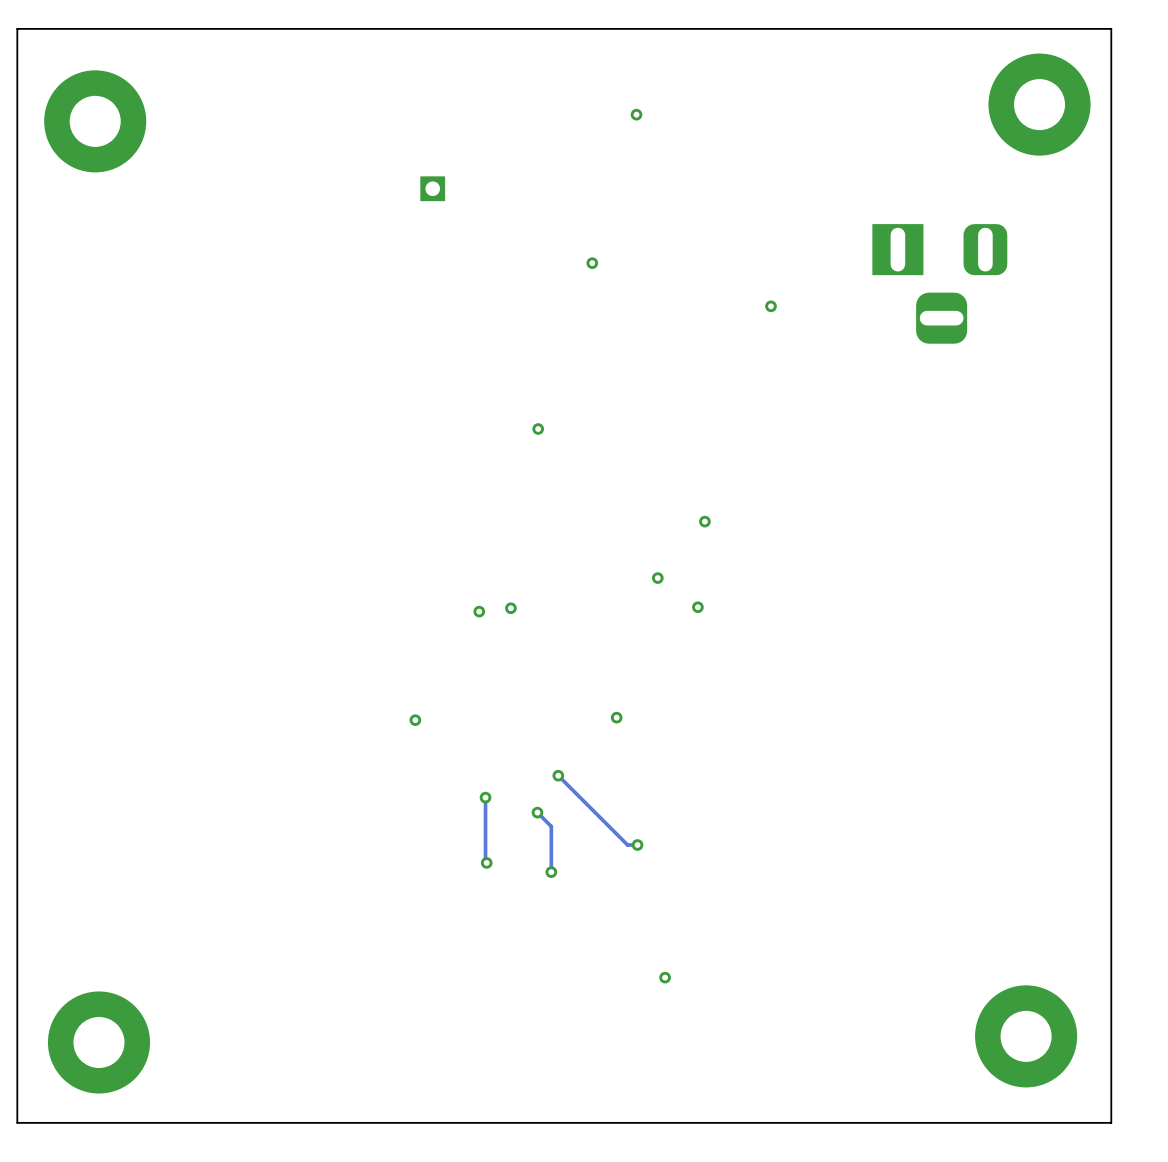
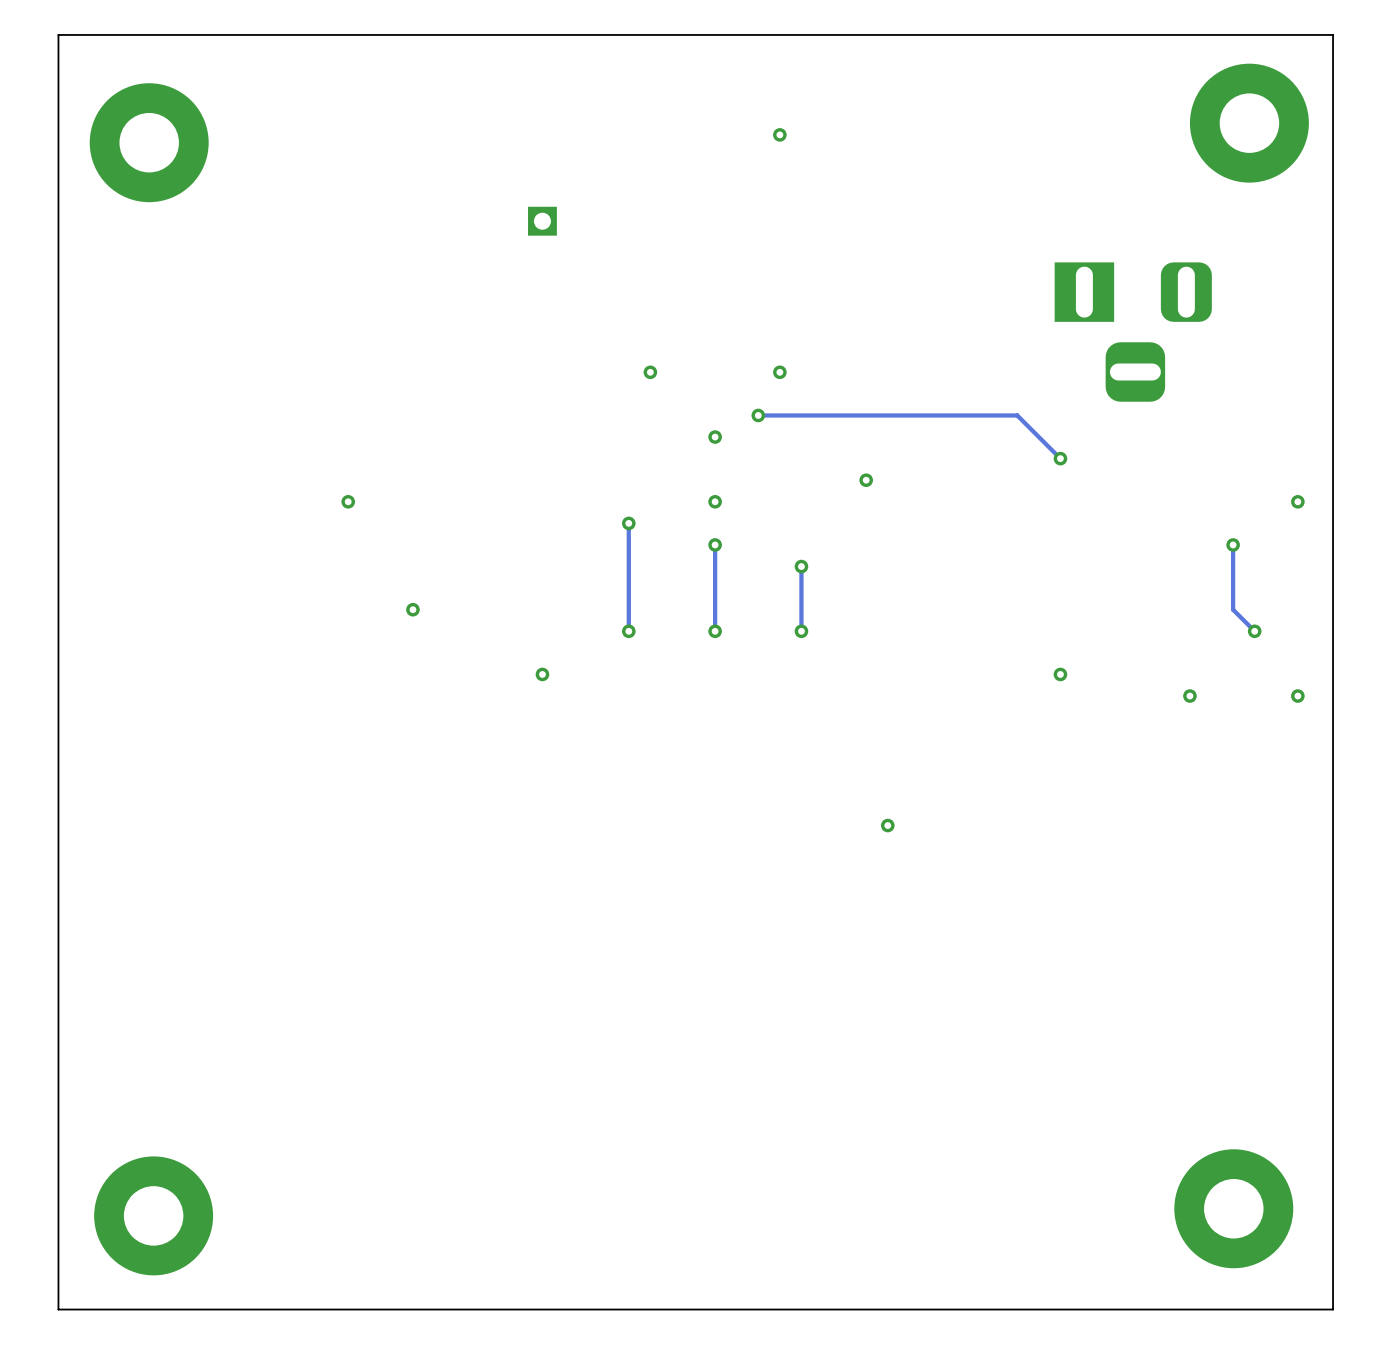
via: (592, 263) -> none
via: (770, 306) -> none
via: none -> (650, 372)
via: none -> (779, 372)
track: none -> (758, 415) (1017, 415) (1060, 458)
via: none -> (758, 415)
via: none -> (715, 437)
via: none -> (1060, 458)
via: none -> (866, 480)
via: none -> (348, 501)
via: (538, 429) -> none
via: none -> (715, 501)
via: none -> (1297, 501)
track: none -> (628, 523) (628, 631)
via: none -> (628, 523)
track: none -> (715, 544) (715, 631)
via: none -> (715, 544)
track: none -> (1233, 544) (1233, 609) (1254, 631)
via: none -> (1233, 544)
track: none -> (801, 566) (801, 631)
via: none -> (801, 566)
via: (704, 521) -> none
via: none -> (412, 609)
via: none -> (628, 631)
via: none -> (715, 631)
via: none -> (801, 631)
via: none -> (1254, 631)
via: none -> (542, 674)
via: none -> (1060, 674)
via: (657, 578) -> none
via: none -> (1189, 696)
via: none -> (1297, 696)
via: (697, 607) -> none
via: (510, 608) -> none
via: (479, 611) -> none
via: none -> (887, 825)
via: (616, 717) -> none
via: (415, 720) -> none
track: (558, 775) (627, 845) (637, 845) -> none
via: (558, 775) -> none
track: (485, 797) (486, 862) -> none
via: (485, 797) -> none
track: (537, 812) (551, 826) (551, 872) -> none
via: (537, 812) -> none
via: (637, 845) -> none
via: (486, 862) -> none
via: (551, 872) -> none
via: (665, 977) -> none

